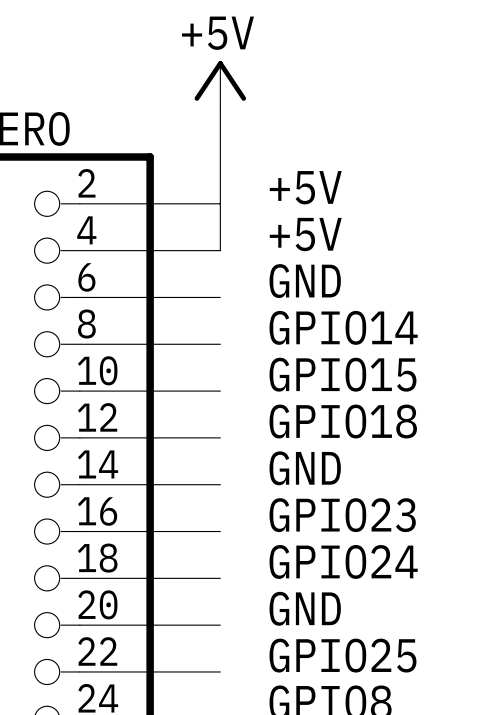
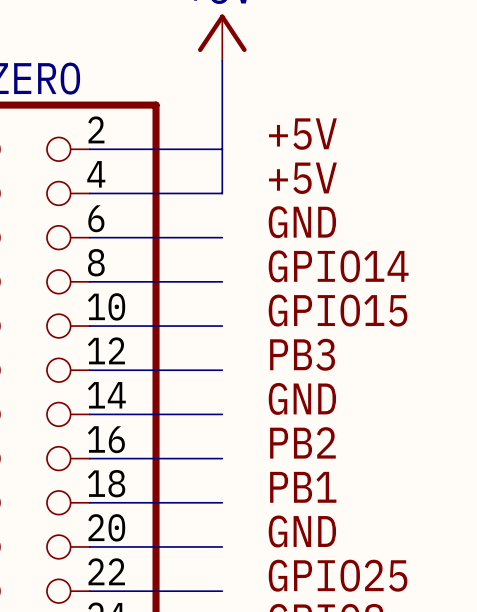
label: GPIO18 (343, 421) -> PB3 (302, 354)
label: GPIO23 (342, 515) -> PB2 (302, 442)
label: GPIO24 (343, 561) -> PB1 (303, 487)

